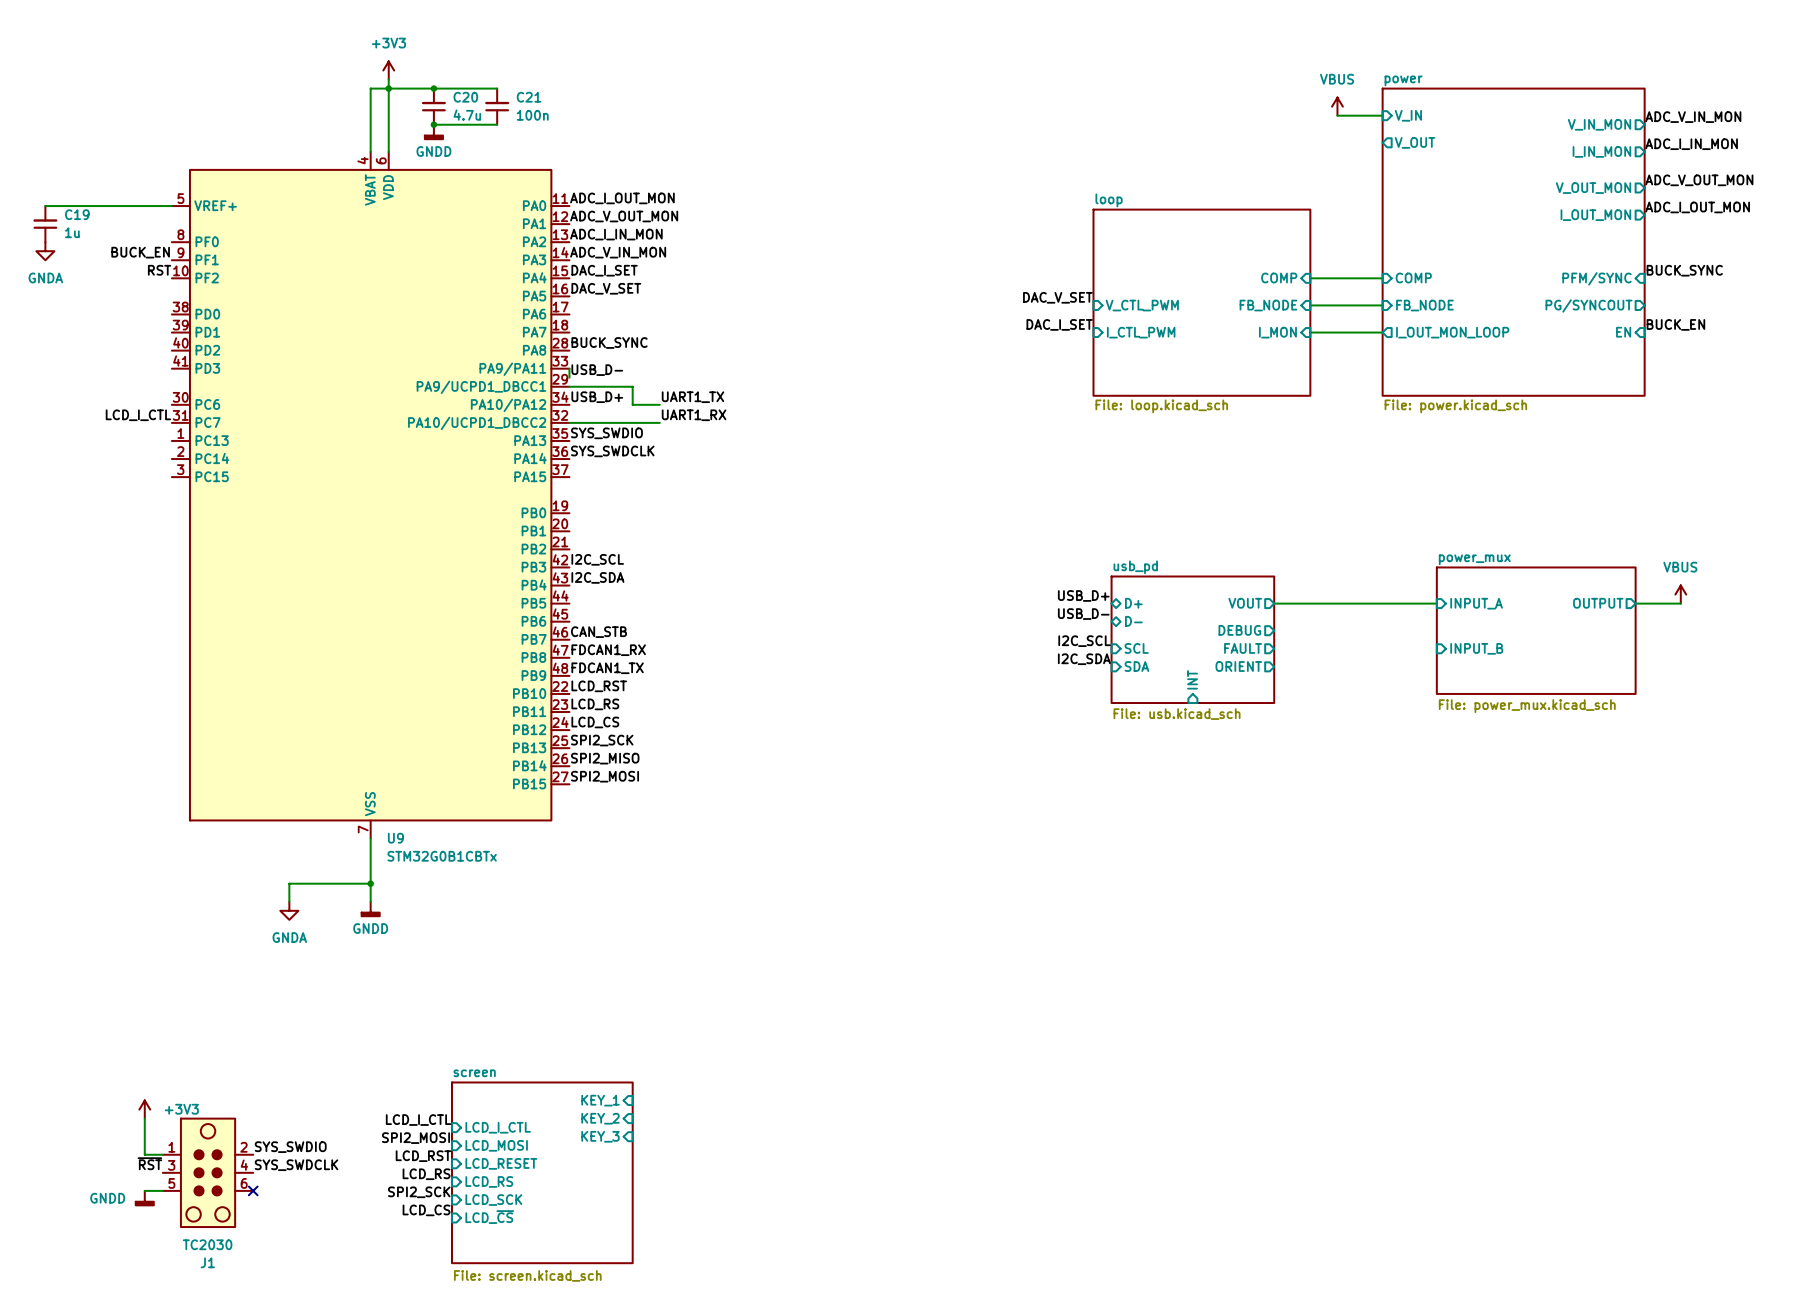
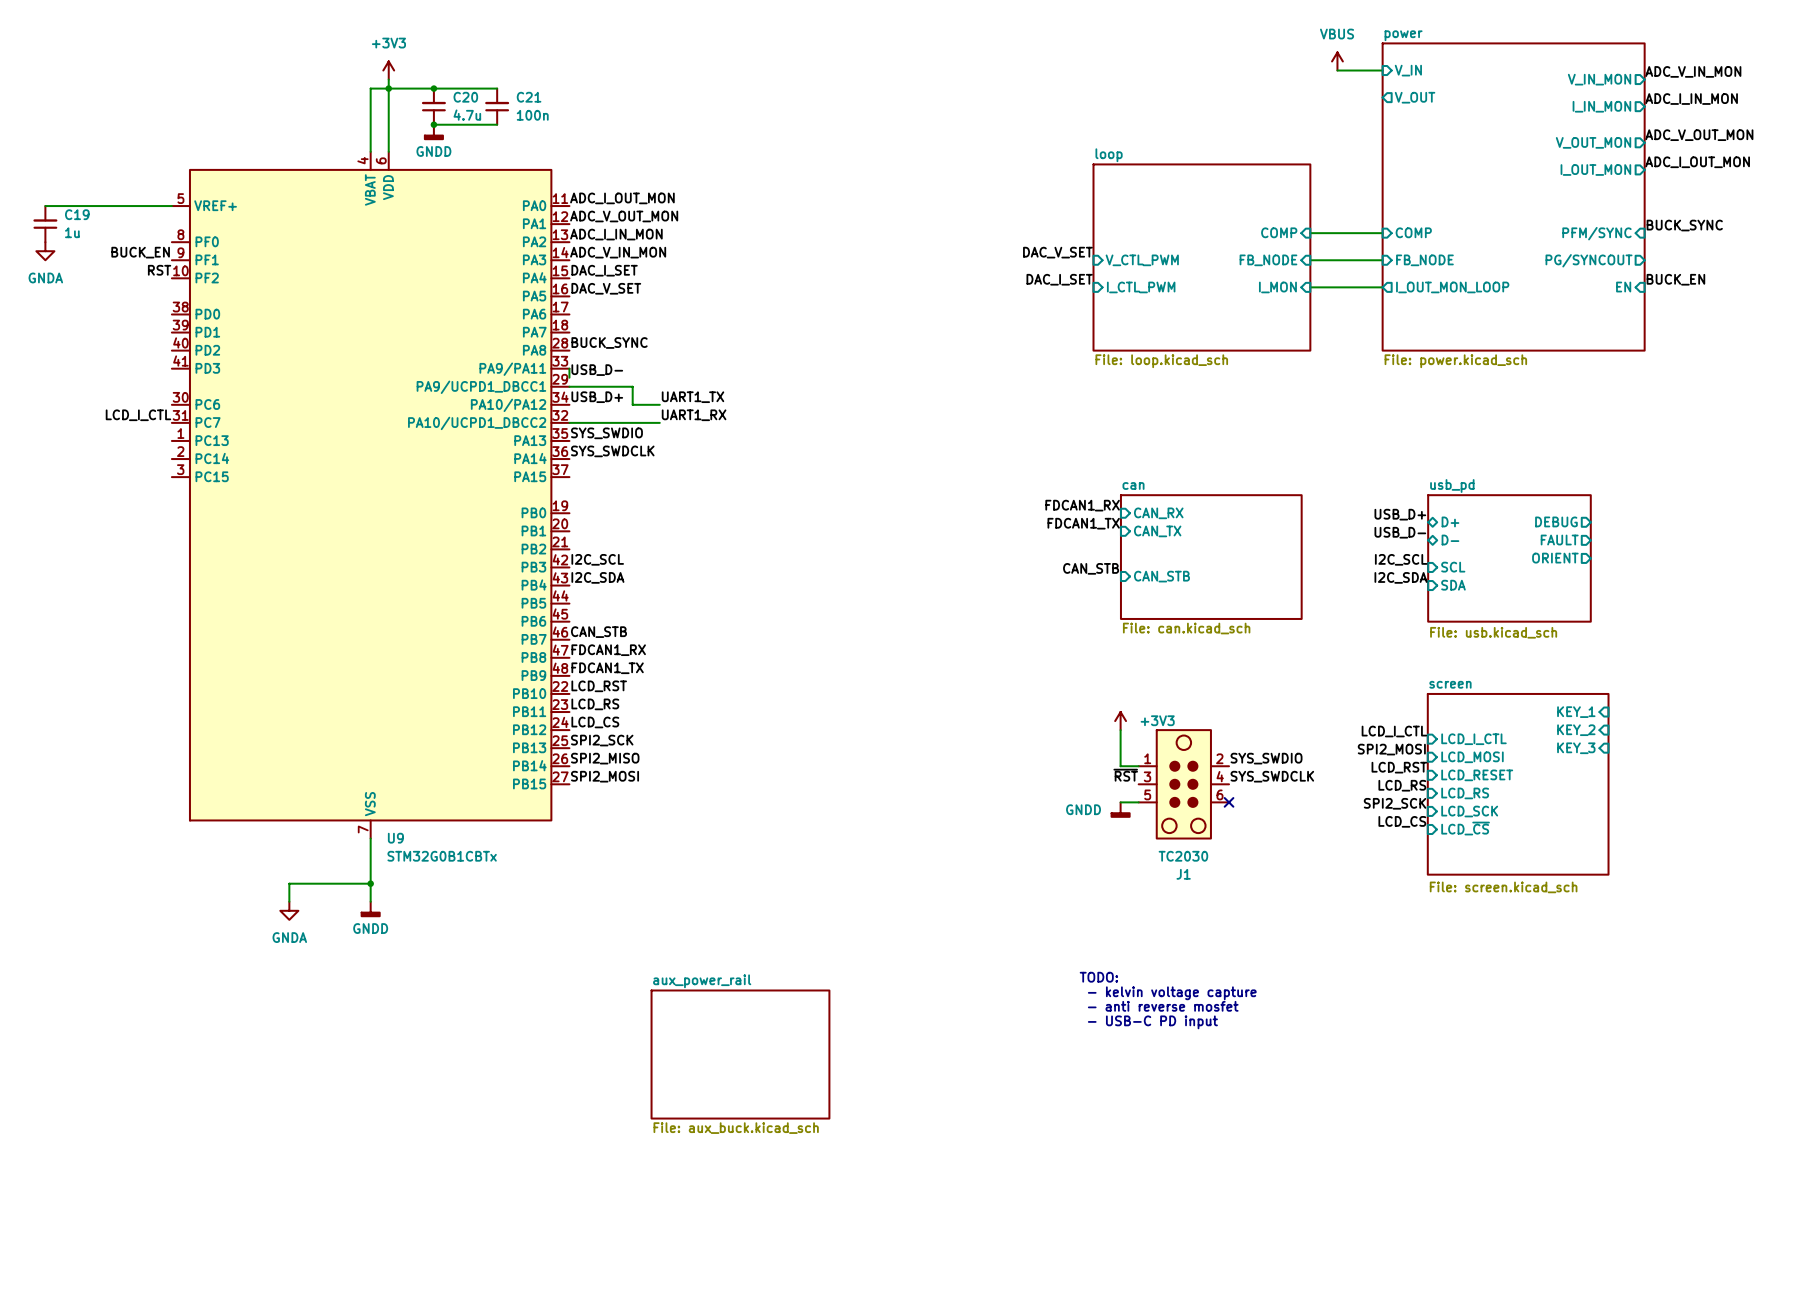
power symbol position: VBUS (1337, 106) -> VBUS (1337, 61)
wire: (1337, 115) (1382, 115) -> (1337, 70) (1382, 70)
sheet pin position: V_IN (1408, 115) -> V_IN (1408, 70)
label position: ADC_V_IN_MON (1693, 117) -> ADC_V_IN_MON (1693, 71)
sheet pin position: V_IN_MON (1599, 124) -> V_IN_MON (1599, 79)
sheet pin position: V_OUT (1415, 142) -> V_OUT (1415, 97)
label position: ADC_I_IN_MON (1691, 144) -> ADC_I_IN_MON (1691, 99)
sheet pin position: I_IN_MON (1601, 151) -> I_IN_MON (1601, 106)
label position: ADC_V_OUT_MON (1699, 180) -> ADC_V_OUT_MON (1699, 135)
sheet pin position: V_OUT_MON (1593, 188) -> V_OUT_MON (1593, 142)
label position: ADC_I_OUT_MON (1697, 207) -> ADC_I_OUT_MON (1697, 162)
sheet pin position: I_OUT_MON (1595, 215) -> I_OUT_MON (1595, 169)
sheet power position: (1513, 242) -> (1513, 197)
label position: BUCK_SYNC (1684, 270) -> BUCK_SYNC (1684, 225)
sheet pin position: COMP (1279, 277) -> COMP (1279, 232)
sheet pin position: COMP (1413, 277) -> COMP (1413, 232)
wire: (1310, 278) (1382, 278) -> (1310, 233) (1382, 233)
sheet pin position: PFM/SYNC (1596, 278) -> PFM/SYNC (1596, 233)
label position: DAC_V_SET (1057, 297) -> DAC_V_SET (1057, 252)
sheet loop position: (1201, 302) -> (1201, 257)
sheet pin position: V_CTL_PWM (1142, 305) -> V_CTL_PWM (1142, 260)
sheet pin position: FB_NODE (1268, 305) -> FB_NODE (1268, 260)
wire: (1310, 305) (1382, 305) -> (1310, 260) (1382, 260)
sheet pin position: FB_NODE (1424, 305) -> FB_NODE (1424, 260)
sheet pin position: PG/SYNCOUT (1589, 305) -> PG/SYNCOUT (1589, 260)
label position: DAC_I_SET (1059, 324) -> DAC_I_SET (1059, 279)
label position: BUCK_EN (1675, 324) -> BUCK_EN (1675, 279)
sheet pin position: I_CTL_PWM (1141, 332) -> I_CTL_PWM (1141, 287)
sheet pin position: I_MON (1277, 332) -> I_MON (1277, 287)
wire: (1310, 332) (1382, 332) -> (1310, 287) (1382, 287)
sheet pin position: I_OUT_MON_LOOP (1452, 332) -> I_OUT_MON_LOOP (1452, 287)
sheet pin position: EN (1623, 332) -> EN (1623, 287)
label: none -> FDCAN1_RX (1082, 505)
sheet pin: none -> CAN_RX (1158, 513)
label: none -> USB_D+ (1400, 514)
sheet pin: none -> D+ (1450, 521)
sheet pin: none -> DEBUG (1556, 521)
label: none -> FDCAN1_TX (1083, 523)
sheet pin: none -> CAN_TX (1157, 531)
label: none -> USB_D- (1400, 532)
sheet pin: none -> D- (1450, 540)
sheet pin: none -> FAULT (1559, 540)
sheet can: none -> File: can.kicad_sch (1211, 557)
sheet usb_pd: none -> File: usb.kicad_sch (1509, 558)
sheet pin: none -> ORIENT (1555, 558)
label: none -> I2C_SCL (1401, 559)
sheet pin: none -> SCL (1453, 567)
label: none -> CAN_STB (1091, 568)
sheet pin: none -> CAN_STB (1161, 576)
label: none -> I2C_SDA (1400, 577)
sheet pin: none -> SDA (1453, 585)
power symbol: VBUS (1680, 594) -> none
label: USB_D+ (1083, 595) -> none
sheet pin: D+ (1133, 603) -> none
sheet pin: VOUT (1245, 603) -> none
wire: (1274, 603) (1436, 603) -> none
sheet pin: INPUT_A (1476, 603) -> none
sheet pin: OUTPUT (1598, 603) -> none
wire: (1635, 603) (1680, 603) -> none
label: USB_D- (1083, 614) -> none
sheet pin: D- (1133, 621) -> none
sheet pin: DEBUG (1239, 630) -> none
sheet power_mux: File: power_mux.kicad_sch (1536, 630) -> none
sheet usb_pd: File: usb.kicad_sch (1192, 639) -> none
label: I2C_SCL (1084, 641) -> none
sheet pin: SCL (1136, 648) -> none
sheet pin: FAULT (1243, 648) -> none
sheet pin: INPUT_B (1476, 648) -> none
label: I2C_SDA (1084, 659) -> none
sheet pin: SDA (1136, 666) -> none
sheet pin: ORIENT (1238, 666) -> none
sheet pin: INT (1192, 679) -> none
sheet pin: none -> KEY_1 (1576, 712)
power symbol: none -> +3V3 (1120, 721)
wire: none -> (1120, 730) (1120, 766) (1138, 766)
sheet pin: none -> KEY_2 (1576, 730)
label: none -> LCD_I_CTL (1394, 731)
sheet pin: none -> LCD_I_CTL (1473, 739)
sheet pin: none -> KEY_3 (1576, 748)
label: none -> SPI2_MOSI (1391, 749)
sheet pin: none -> LCD_MOSI (1472, 757)
label: none -> SYS_SWDIO (1266, 758)
label: none -> LCD_RST (1399, 767)
label: none -> ~{RST} (1125, 775)
sheet pin: none -> LCD_RESET (1477, 775)
label: none -> SYS_SWDCLK (1272, 776)
sheet screen: none -> File: screen.kicad_sch (1518, 784)
label: none -> LCD_RS (1402, 785)
sheet pin: none -> LCD_RS (1465, 793)
wire: none -> (1120, 802) (1138, 802)
no-connect mark: none -> (1229, 802)
label: none -> SPI2_SCK (1395, 803)
power symbol: none -> GNDD (1120, 810)
sheet pin: none -> LCD_SCK (1469, 811)
label: none -> LCD_CS (1402, 821)
sheet pin: none -> LCD_~{CS} (1465, 828)
text: none -> TODO: (1098, 977)
text: none -> - kelvin voltage capture (1172, 993)
text: none -> - anti reverse mosfet (1163, 1006)
text: none -> - USB-C PD input (1152, 1022)
sheet aux_power_rail: none -> File: aux_buck.kicad_sch (740, 1054)
sheet pin: KEY_1 (600, 1100) -> none
power symbol: +3V3 (144, 1109) -> none
wire: (144, 1118) (144, 1154) (162, 1154) -> none
sheet pin: KEY_2 (600, 1118) -> none
label: LCD_I_CTL (418, 1120) -> none
sheet pin: LCD_I_CTL (498, 1127) -> none
sheet pin: KEY_3 (600, 1136) -> none
label: SPI2_MOSI (415, 1138) -> none
sheet pin: LCD_MOSI (496, 1145) -> none
label: SYS_SWDIO (290, 1147) -> none
label: LCD_RST (423, 1156) -> none
label: ~{RST} (149, 1163) -> none
sheet pin: LCD_RESET (501, 1163) -> none
label: SYS_SWDCLK (296, 1165) -> none
J1 position: (208, 1172) -> (1183, 784)
sheet screen: File: screen.kicad_sch (542, 1172) -> none
label: LCD_RS (426, 1174) -> none
sheet pin: LCD_RS (489, 1181) -> none
wire: (144, 1190) (162, 1190) -> none
no-connect mark: (253, 1190) -> none
label: SPI2_SCK (419, 1192) -> none
power symbol: GNDD (144, 1198) -> none
sheet pin: LCD_SCK (493, 1200) -> none
label: LCD_CS (426, 1210) -> none
sheet pin: LCD_~{CS} (489, 1217) -> none

